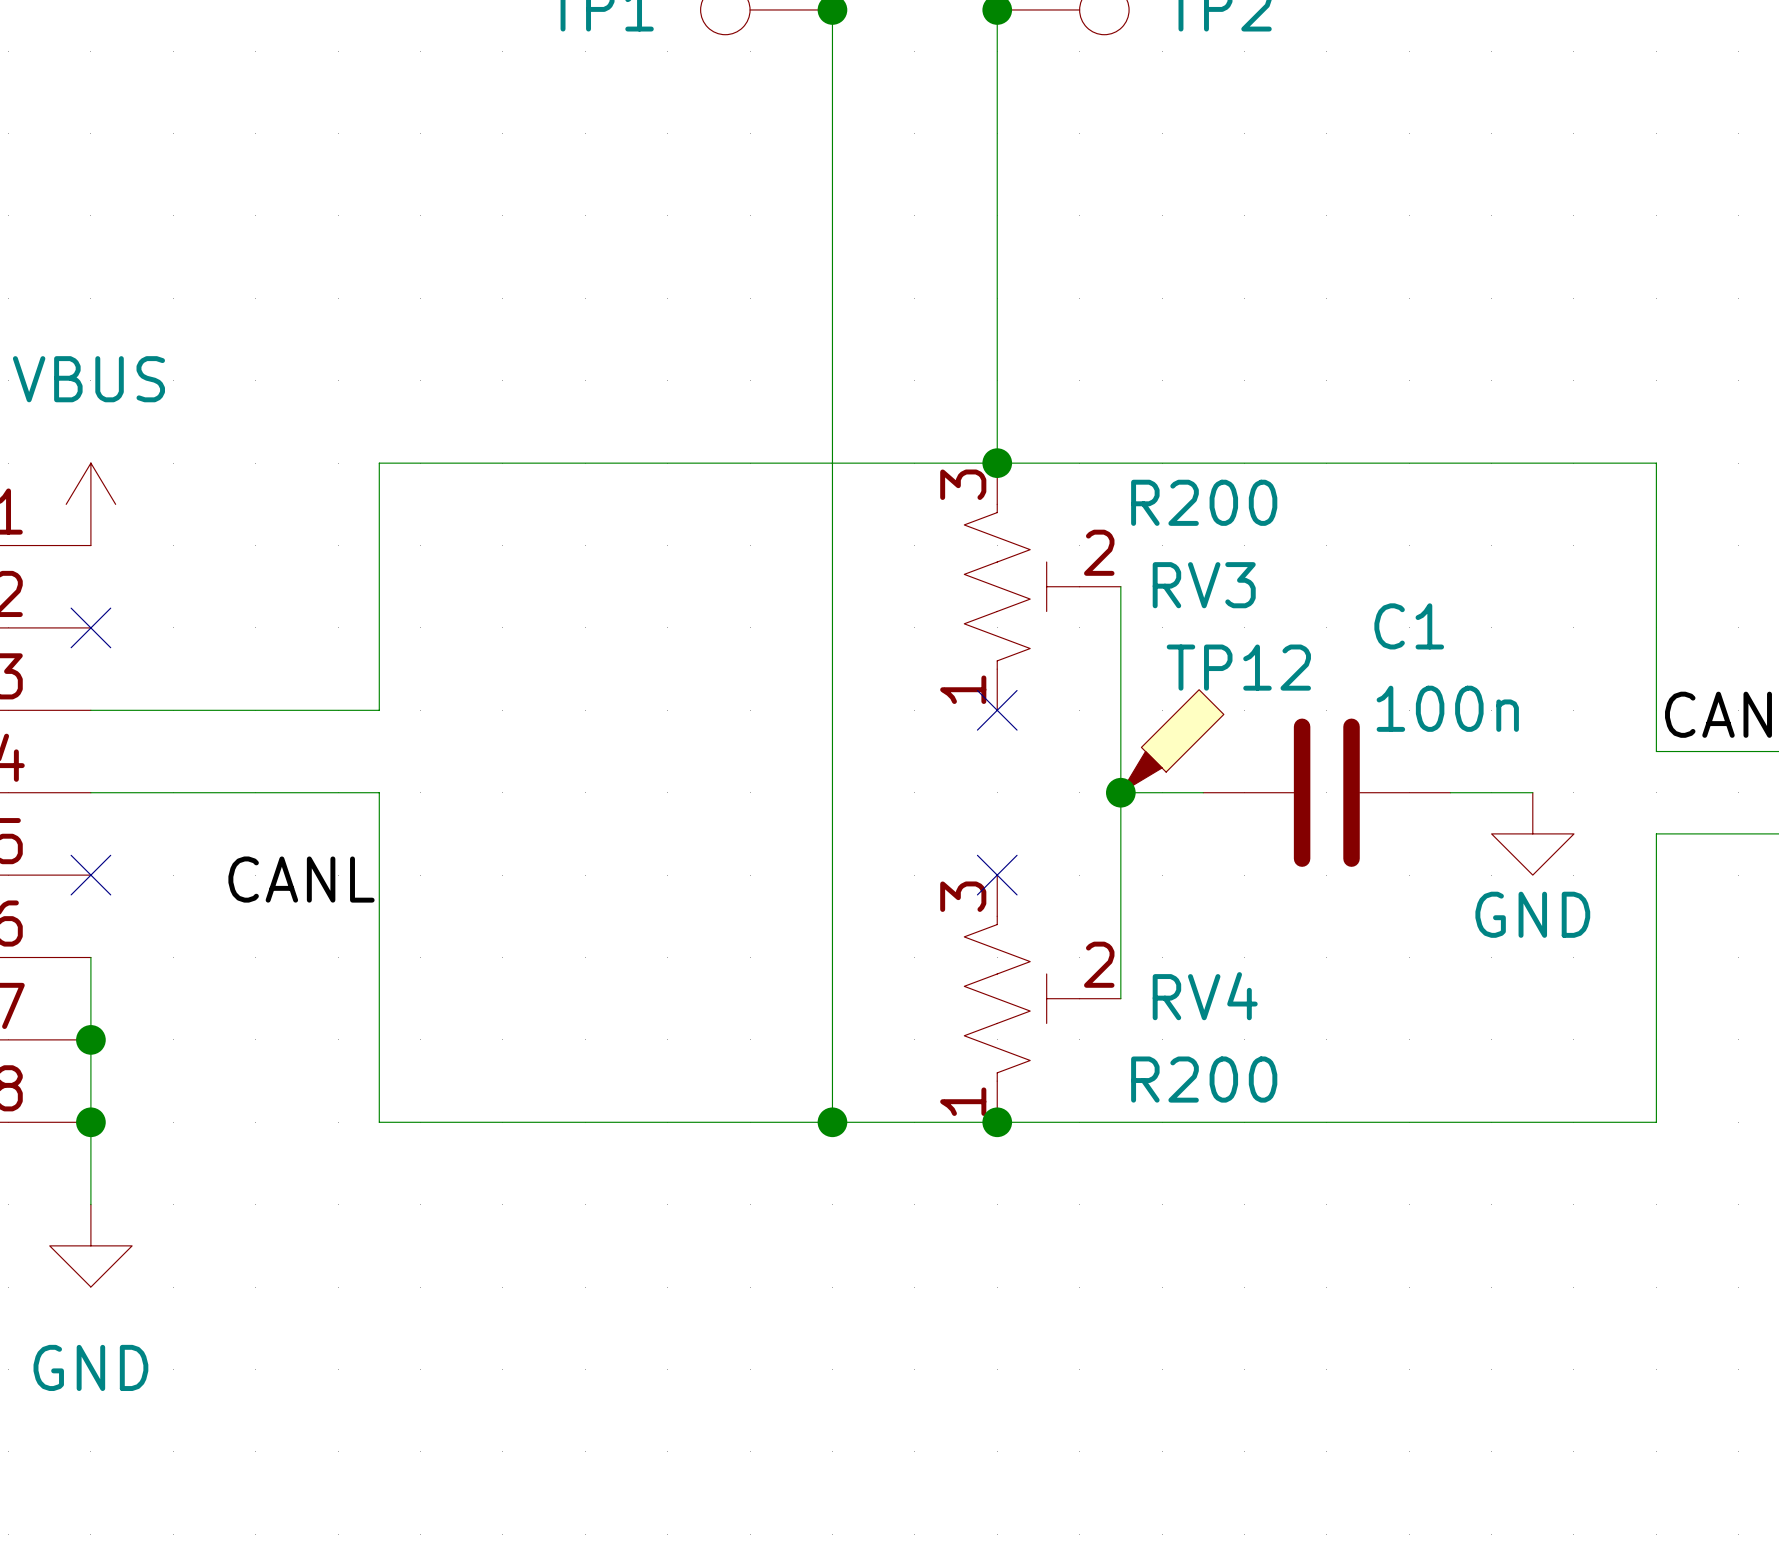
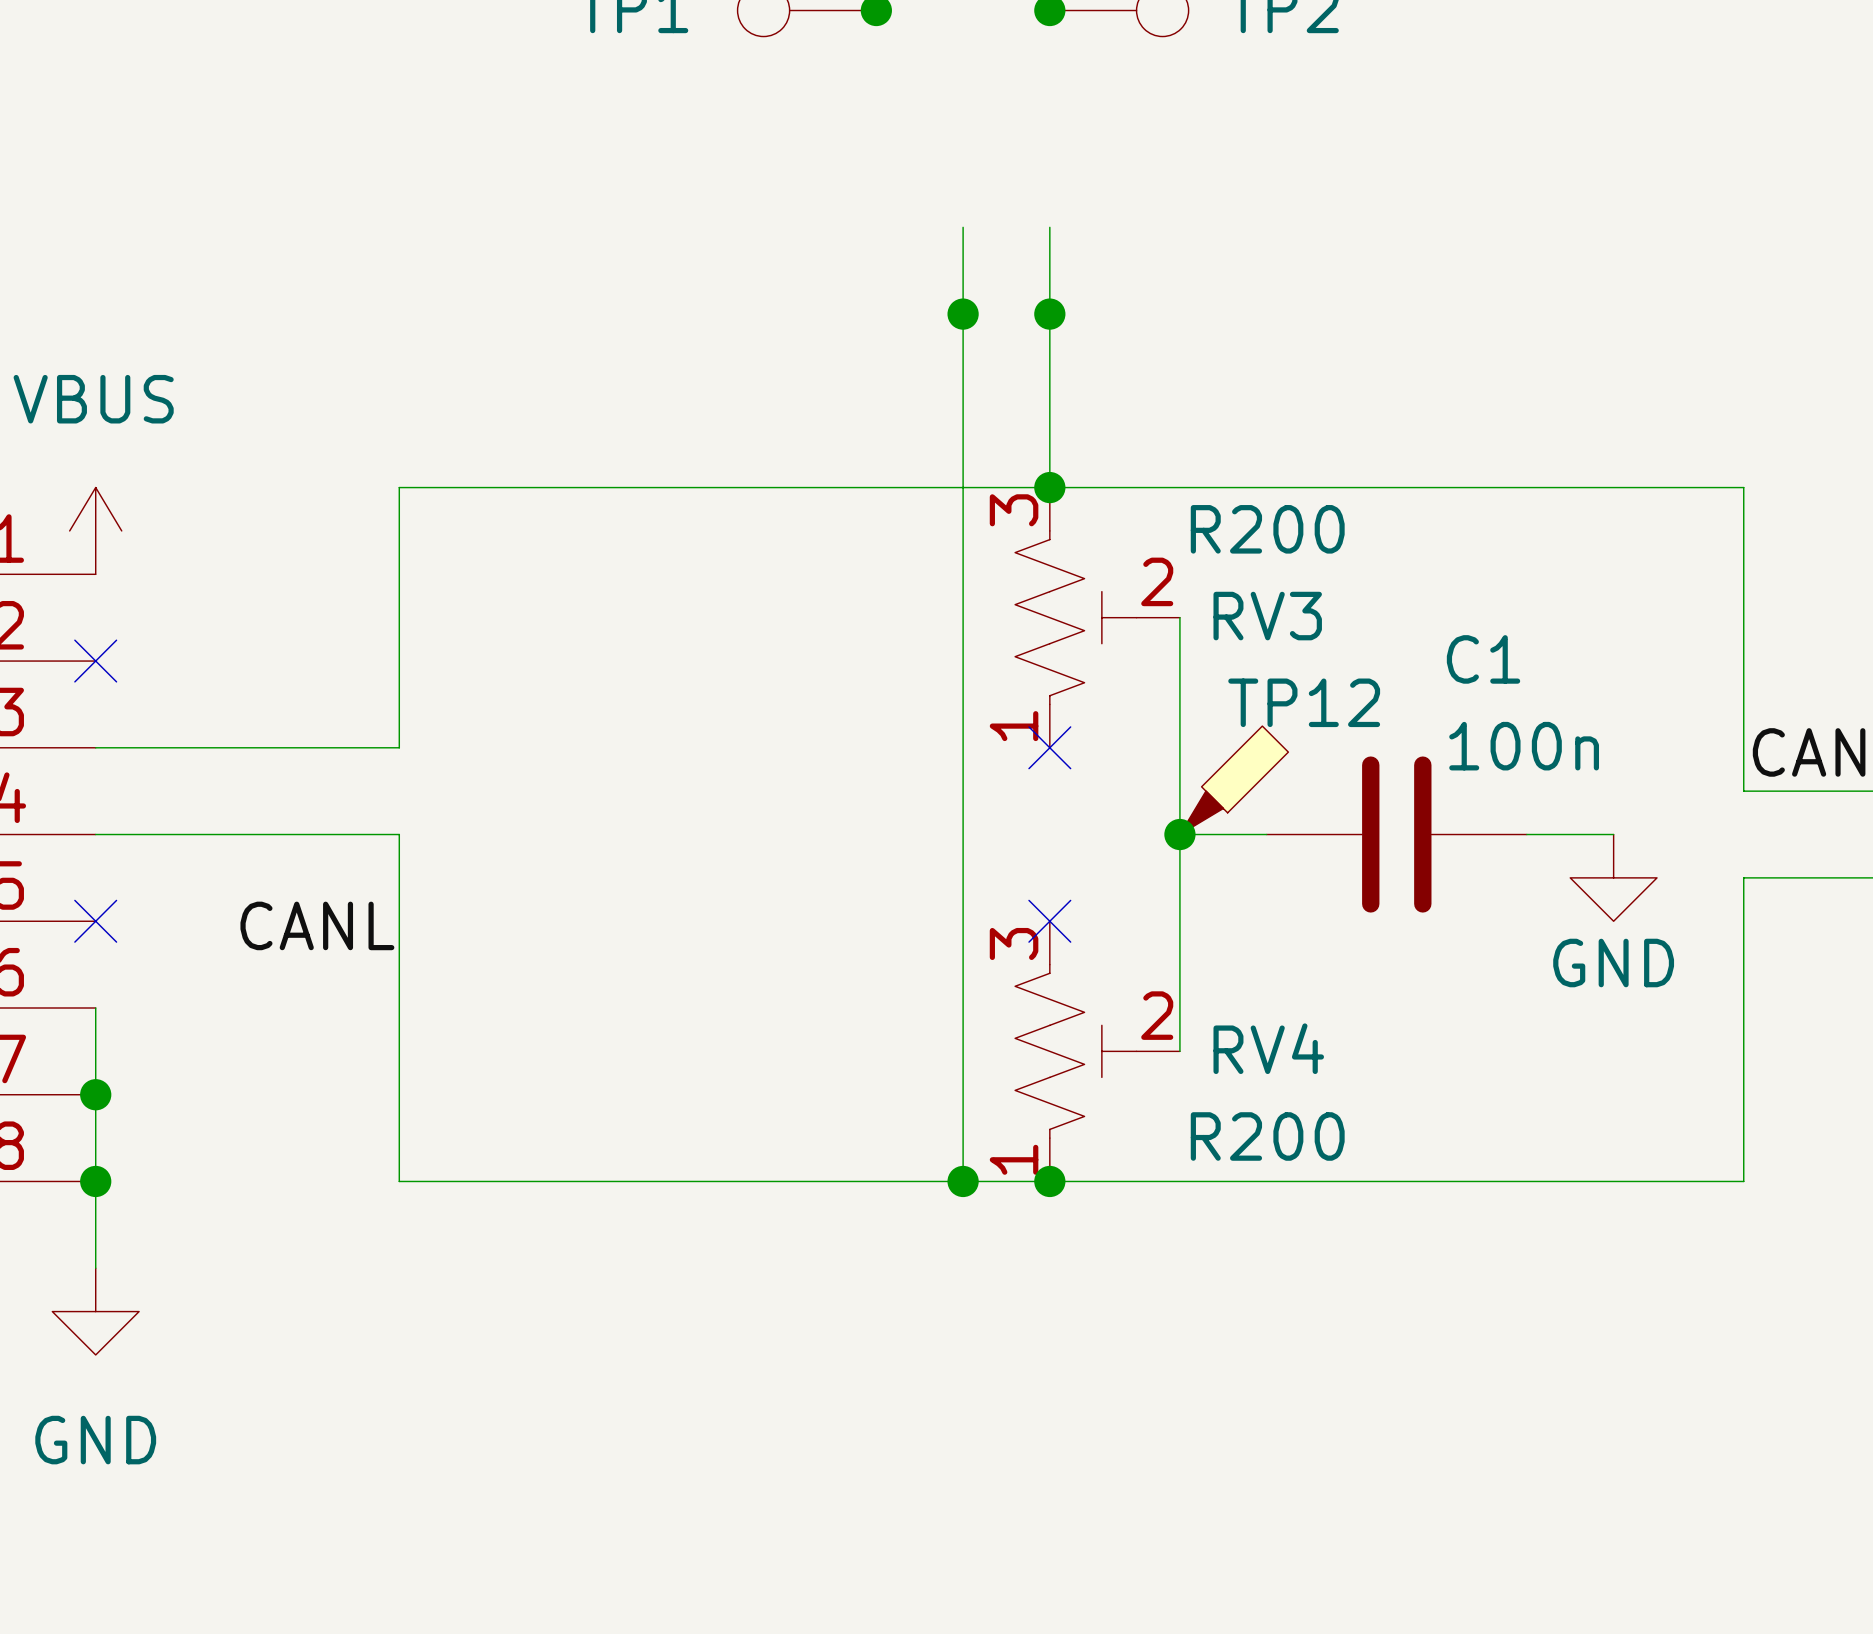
wire: (832, 9) (832, 1122) -> none
wire: (997, 9) (997, 215) -> none
wire: none -> (963, 227) (963, 1181)
junction: none -> (963, 314)
junction: none -> (1049, 314)
junction position: (832, 1122) -> (963, 1181)

